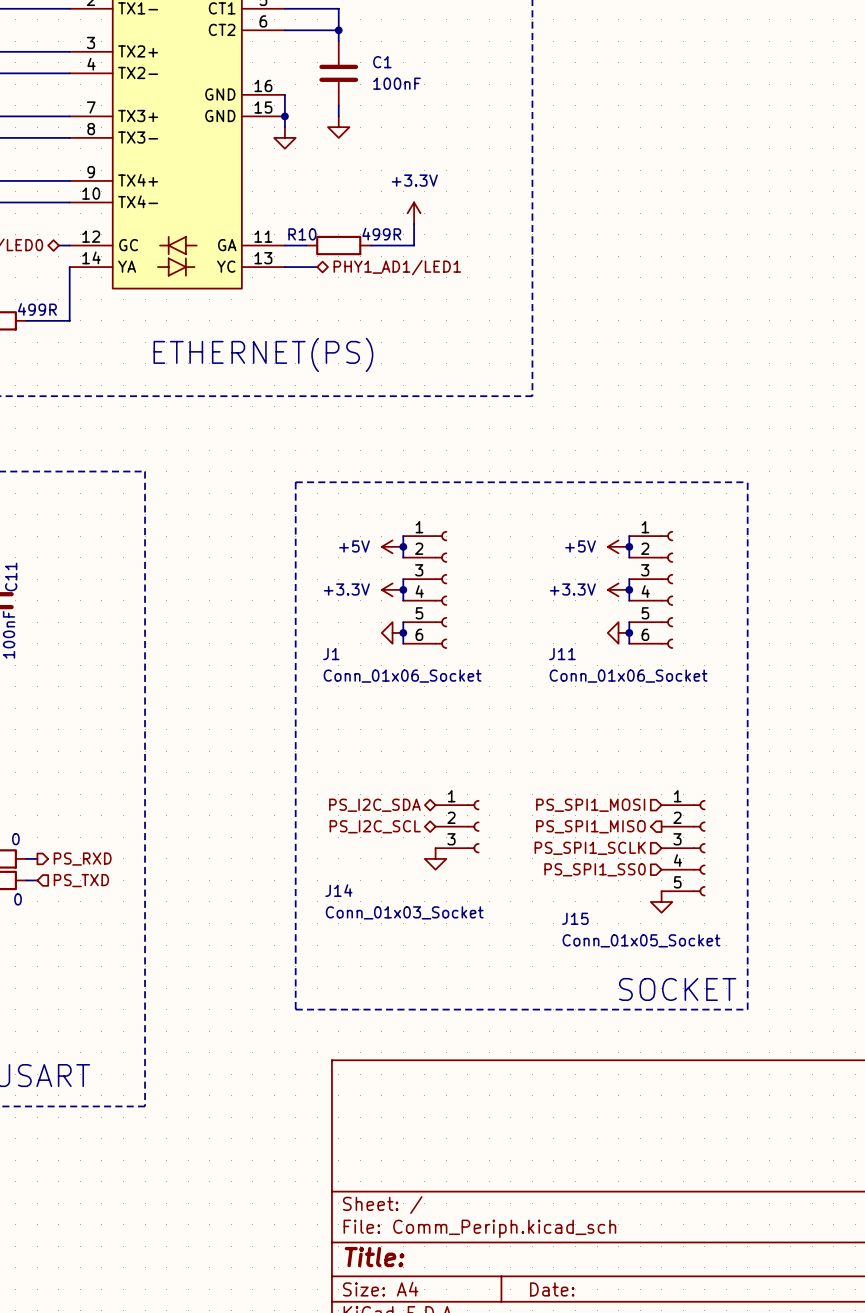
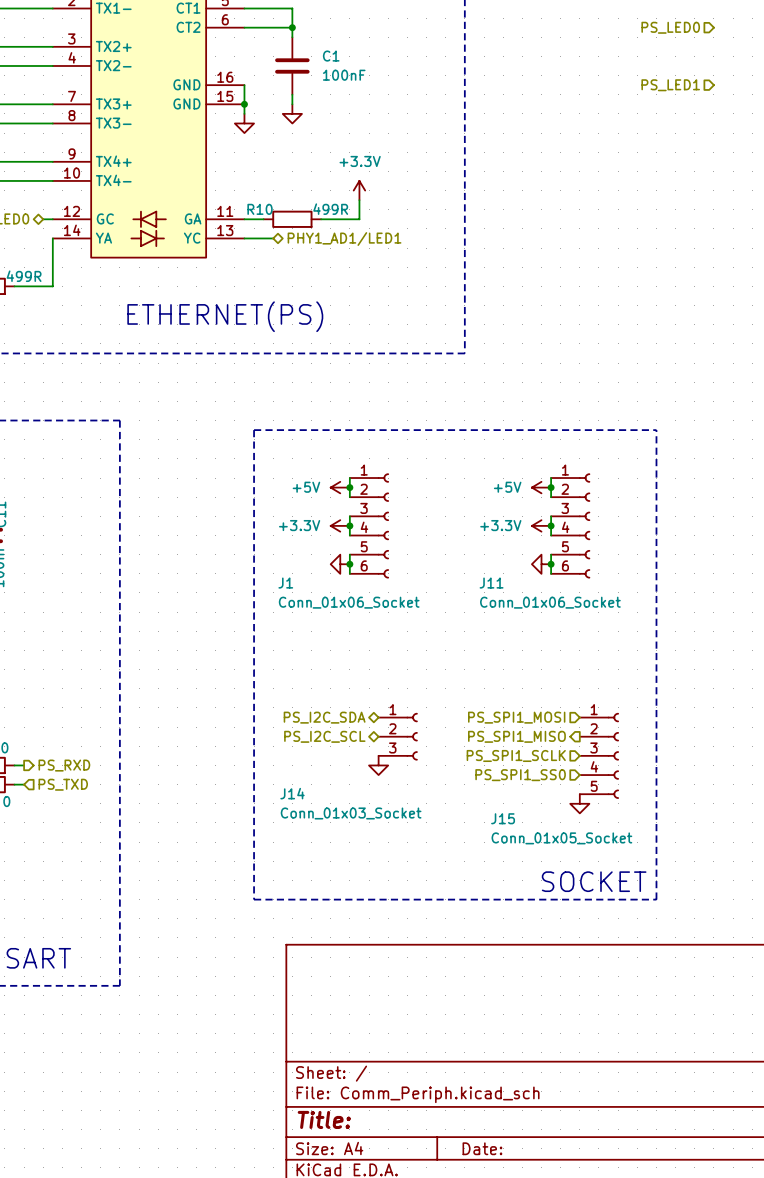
hierarchical label: none -> PS_LED0 (670, 27)
hierarchical label: none -> PS_LED1 (670, 85)

